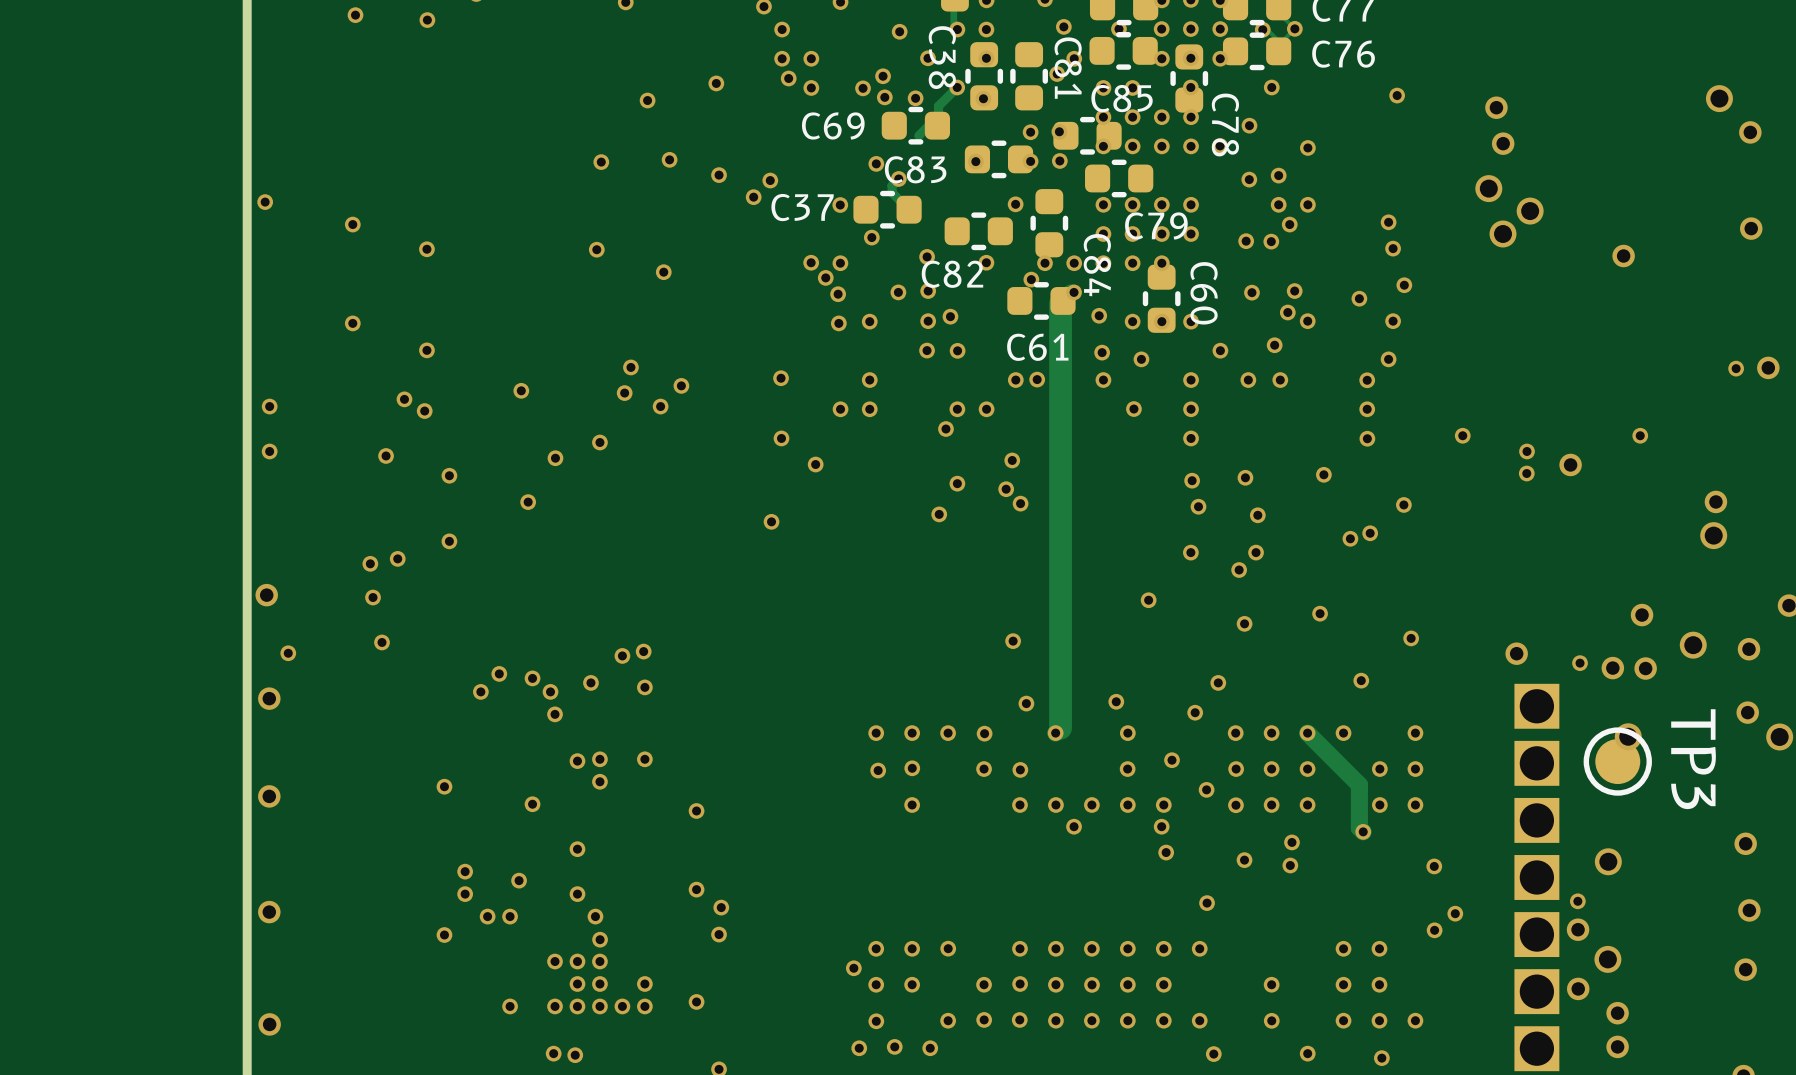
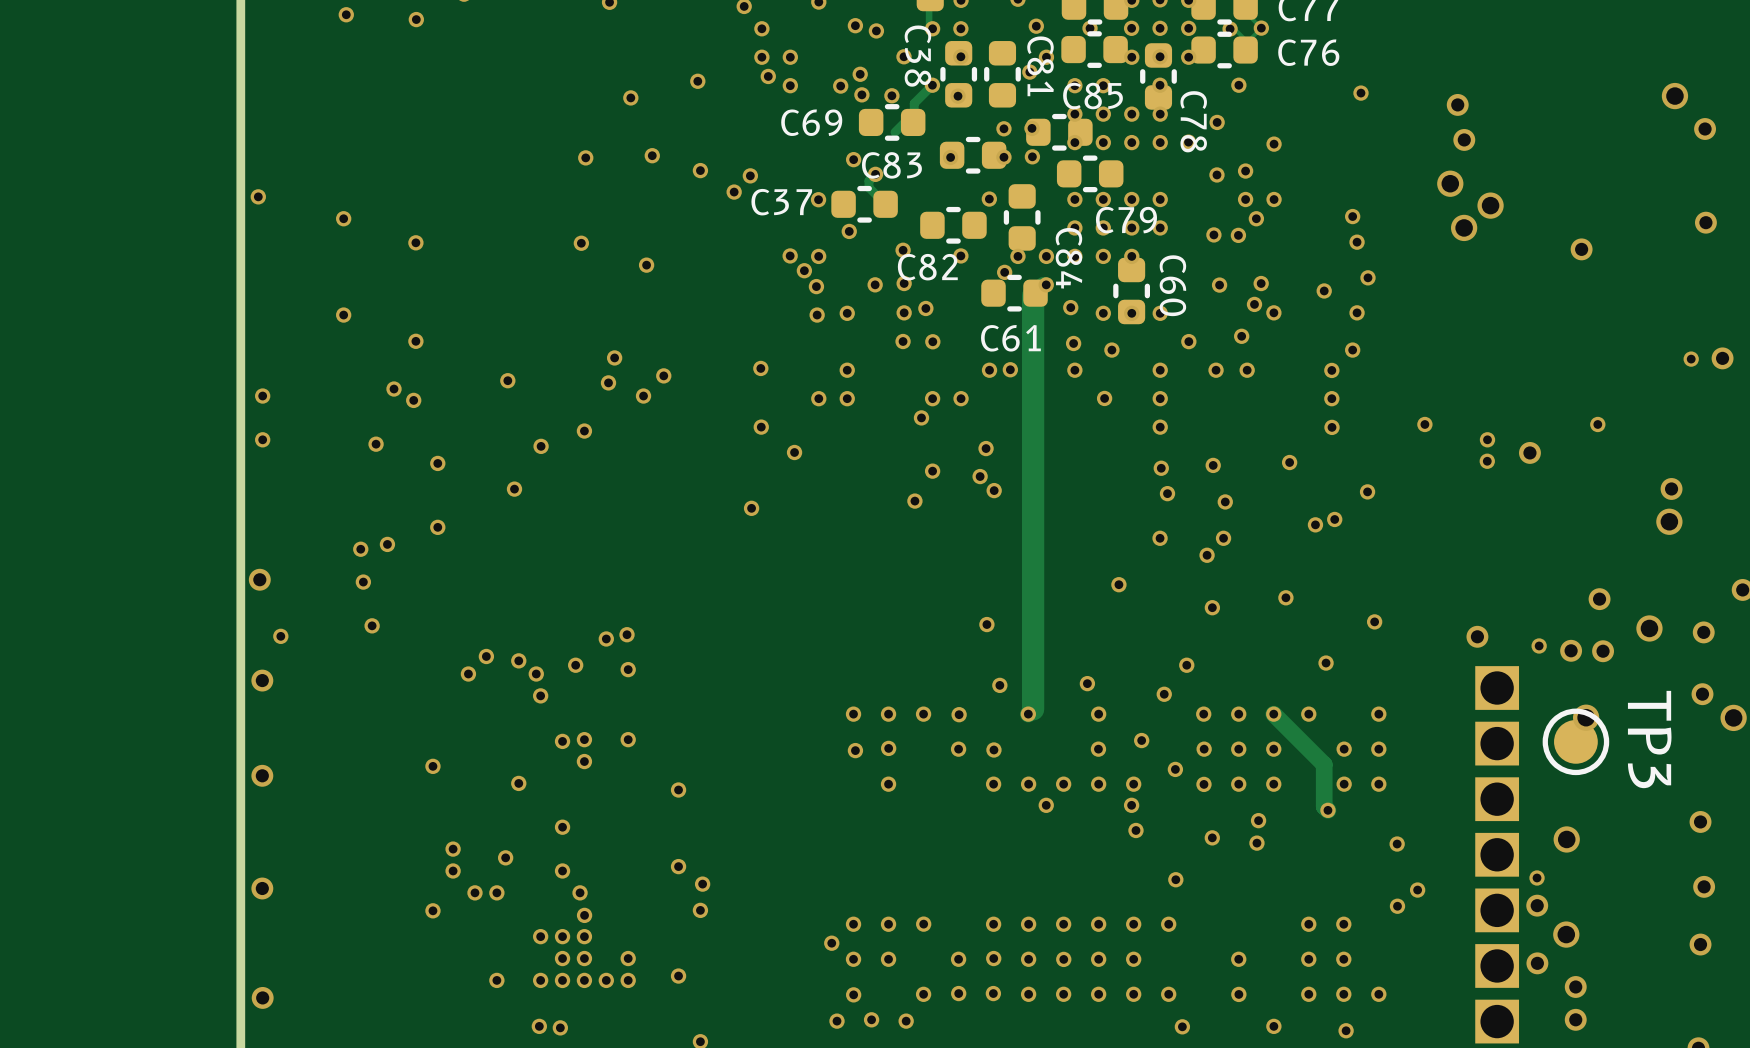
via: none -> (855, 25)

